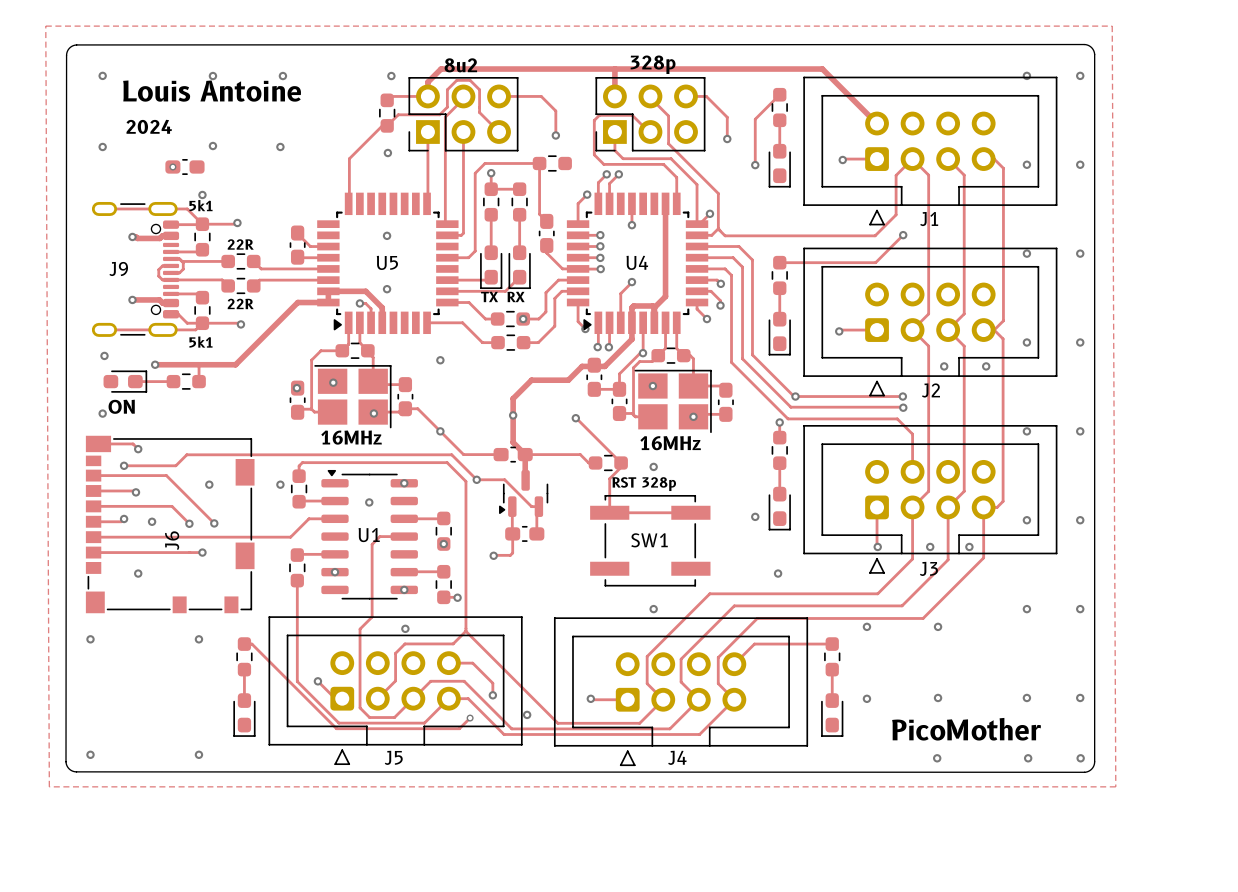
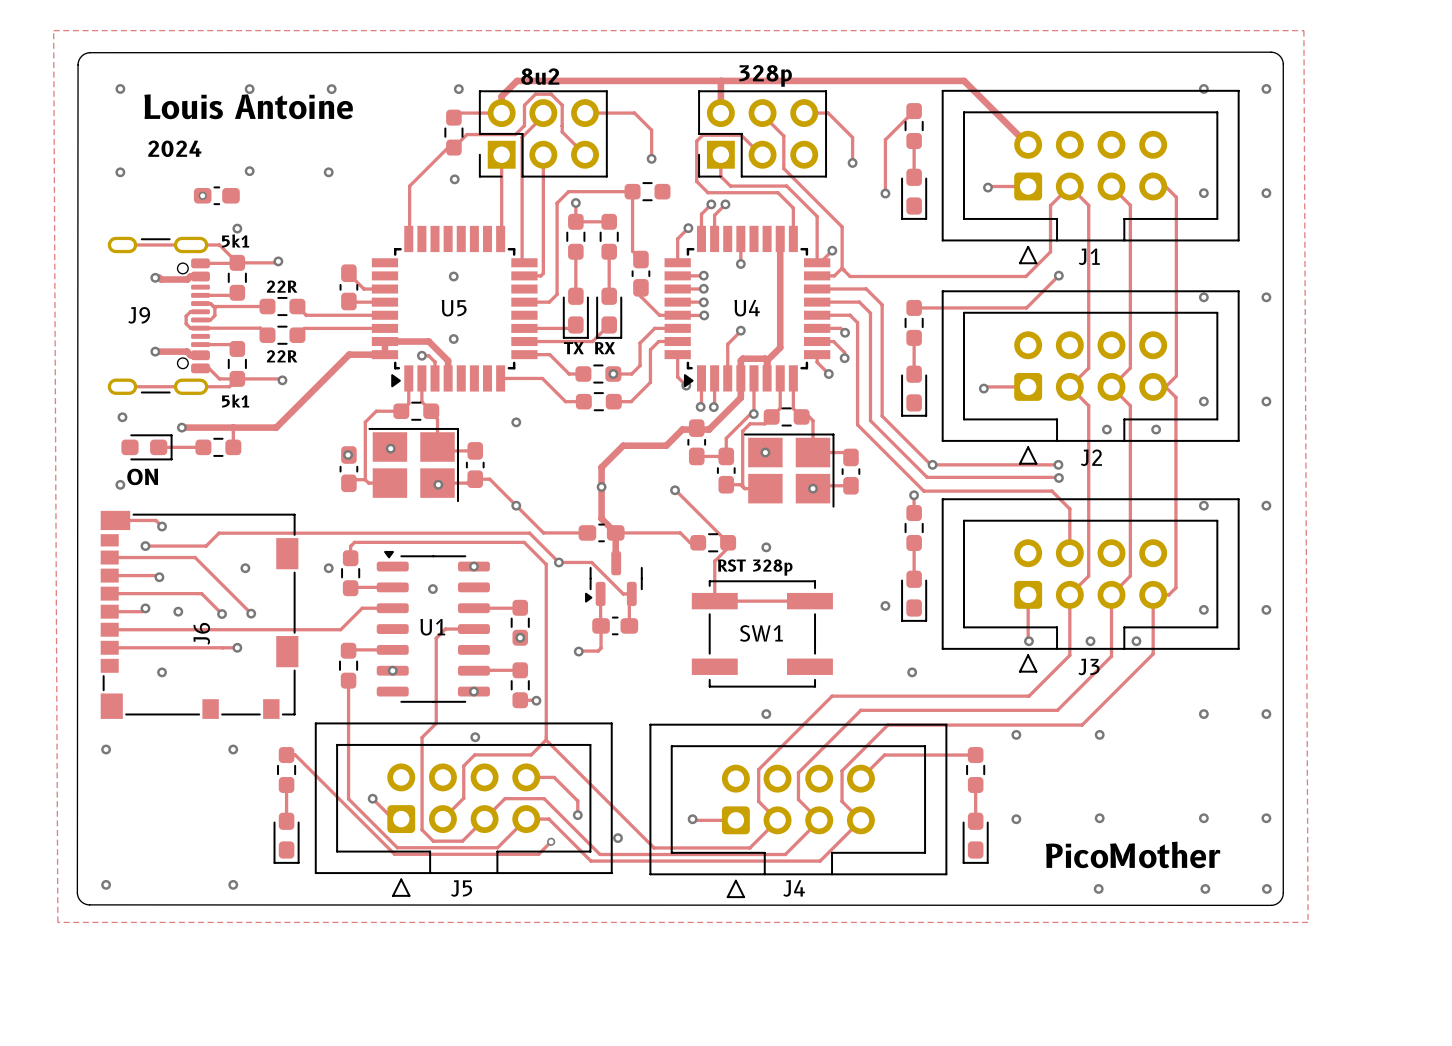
text: 16MHz (351, 437) -> none
text: 16MHz (670, 443) -> none

